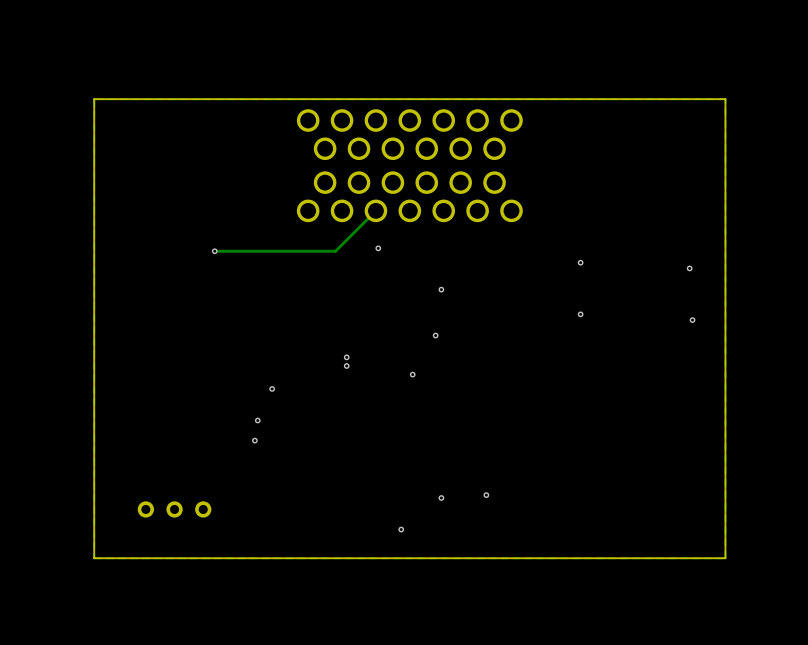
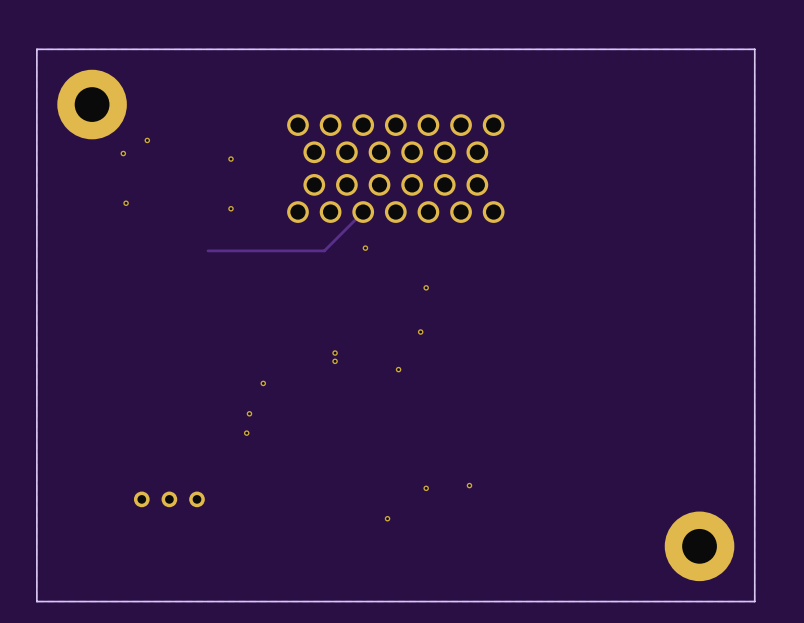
part: none -> (92, 104)
board edge: (725, 99) (94, 99) (94, 558) (725, 558) (725, 99) -> (754, 49) (754, 601) (36, 601) (36, 49) (754, 49)
via: none -> (147, 140)
via: none -> (123, 153)
via: none -> (231, 159)
via: none -> (126, 203)
via: none -> (231, 208)
via: (214, 251) -> none
via: (580, 262) -> none
via: (689, 268) -> none
via: (580, 314) -> none
via: (692, 320) -> none
part: none -> (699, 546)

